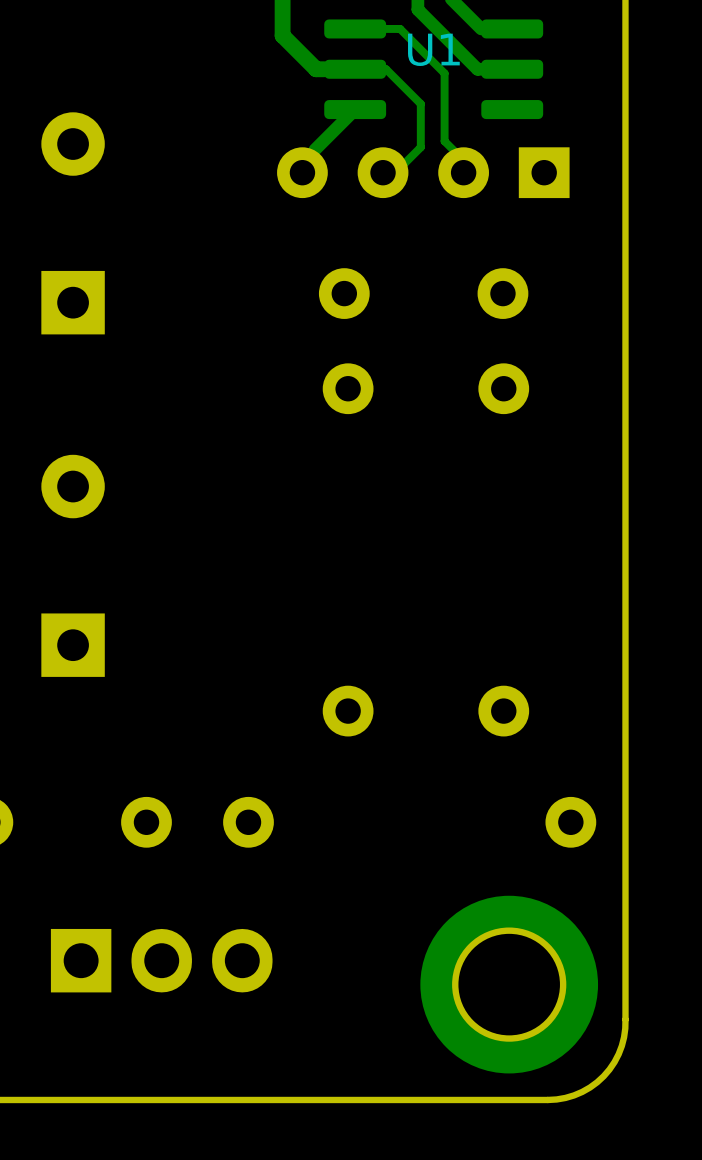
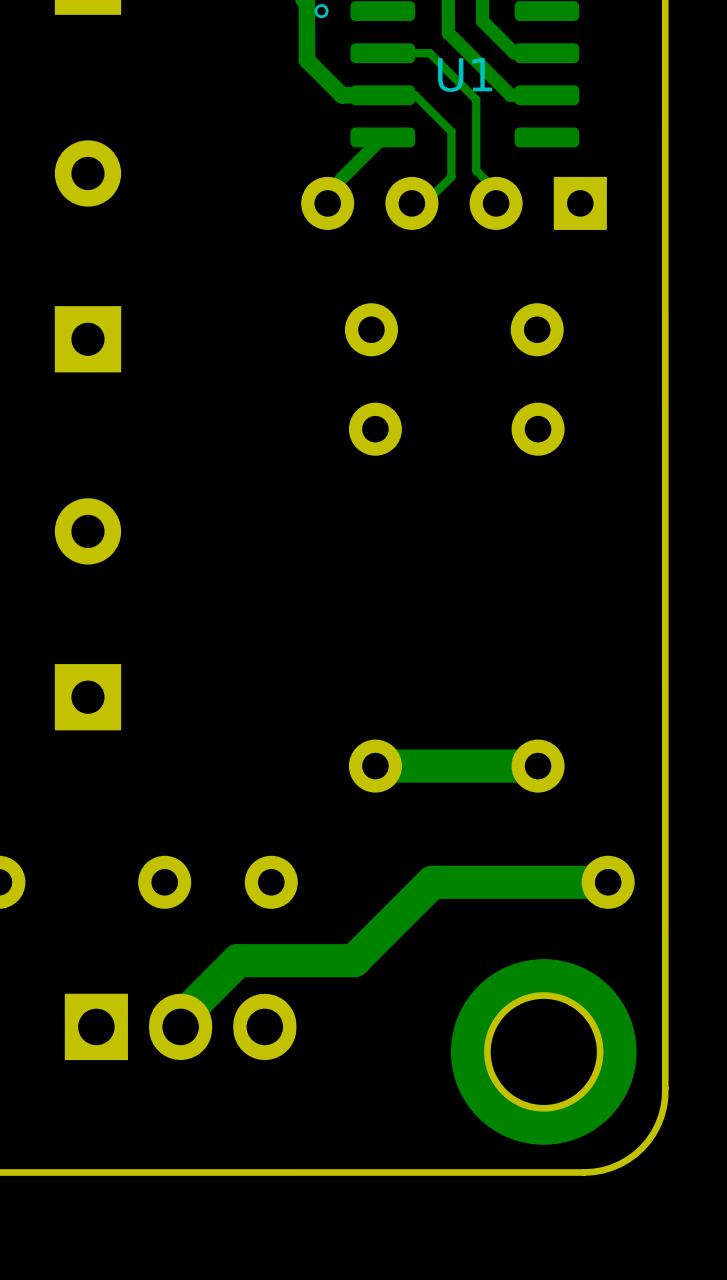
track: none -> (538, 766) (375, 766)
track: none -> (608, 882) (432, 882) (354, 960) (238, 960) (180, 1018) (180, 1026)

